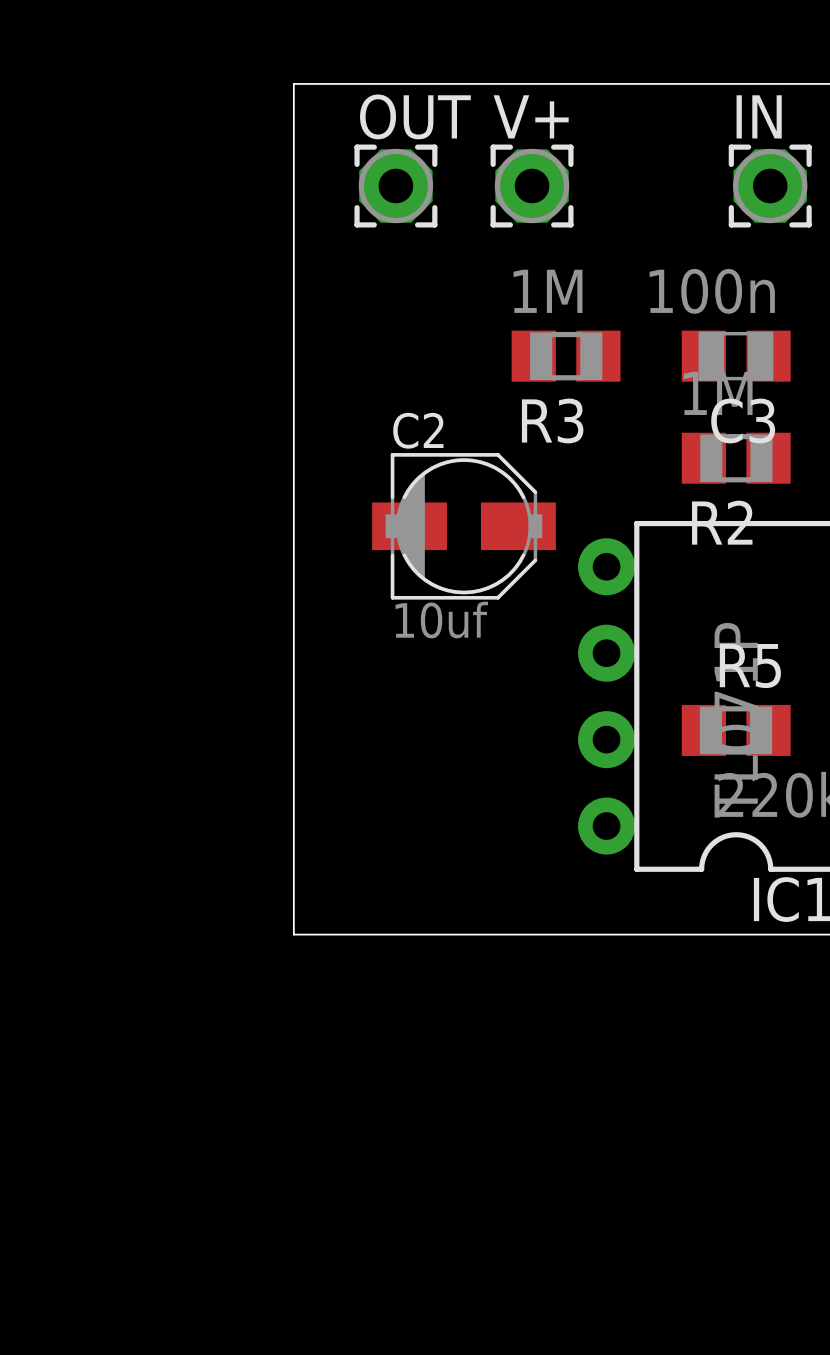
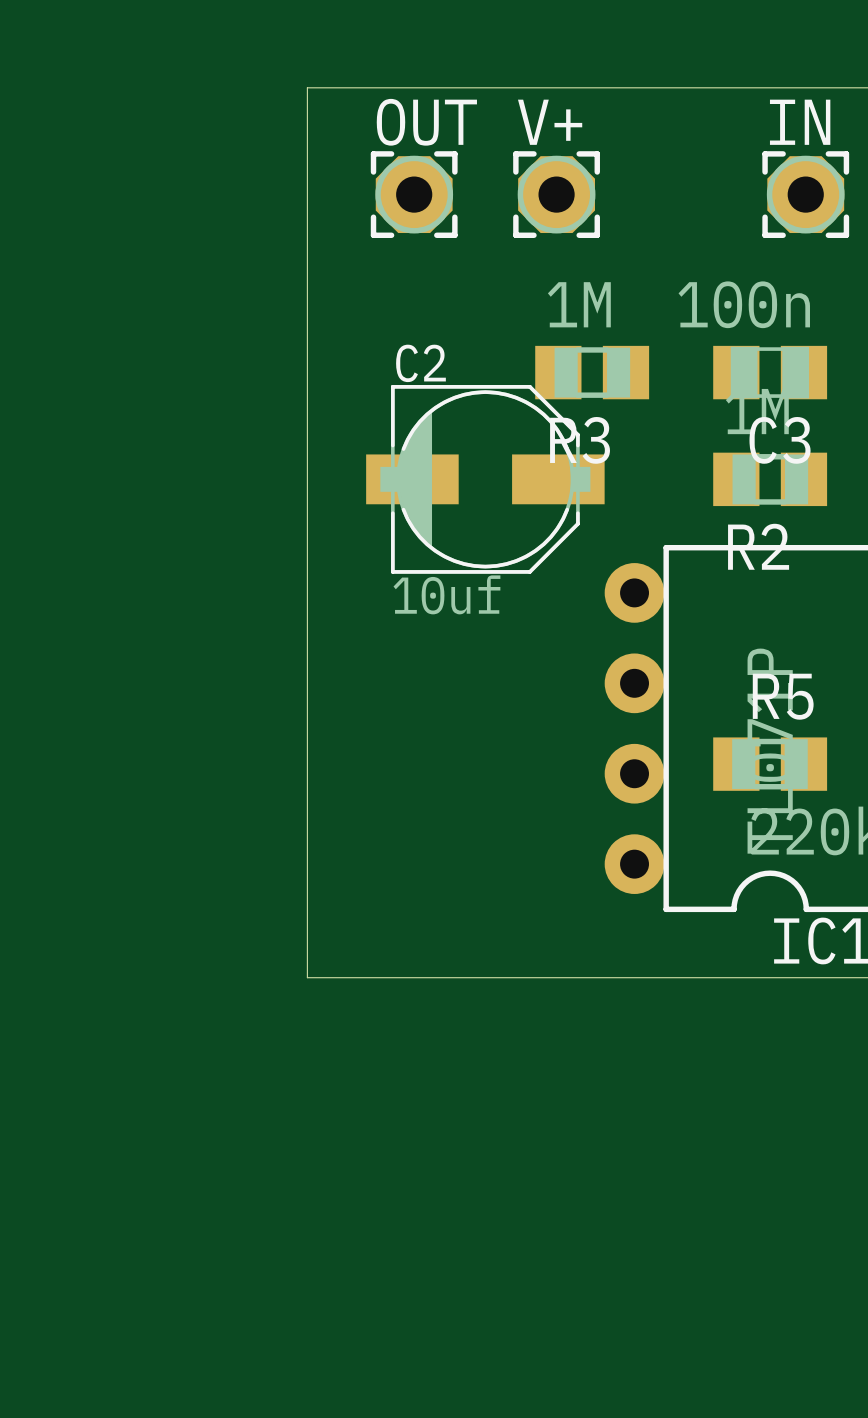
C2 footprint: [372, 453, 556, 600] -> [366, 385, 605, 574]

